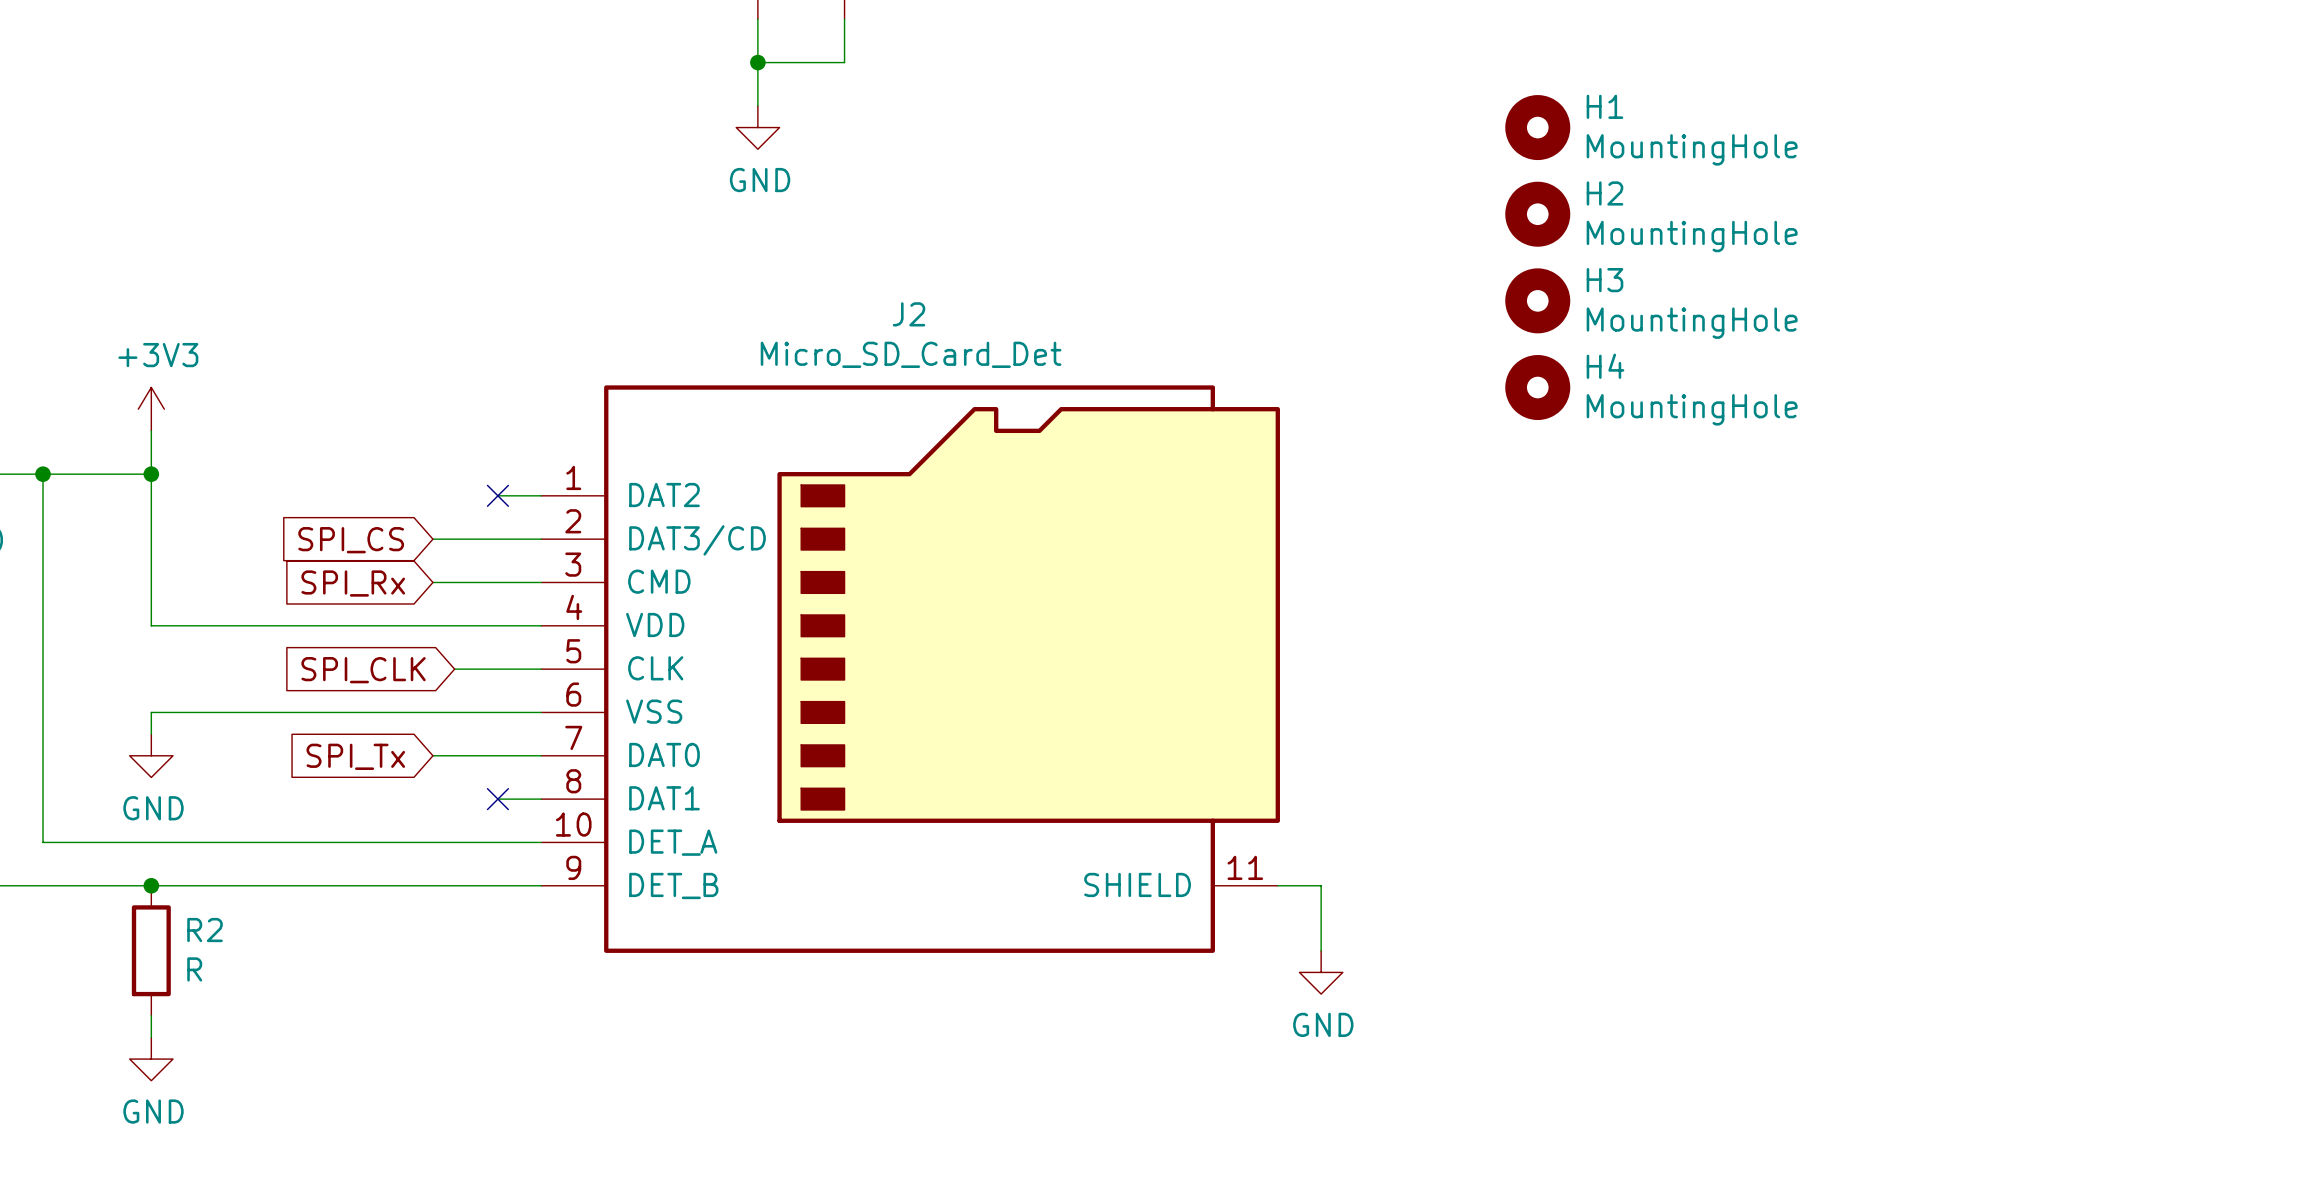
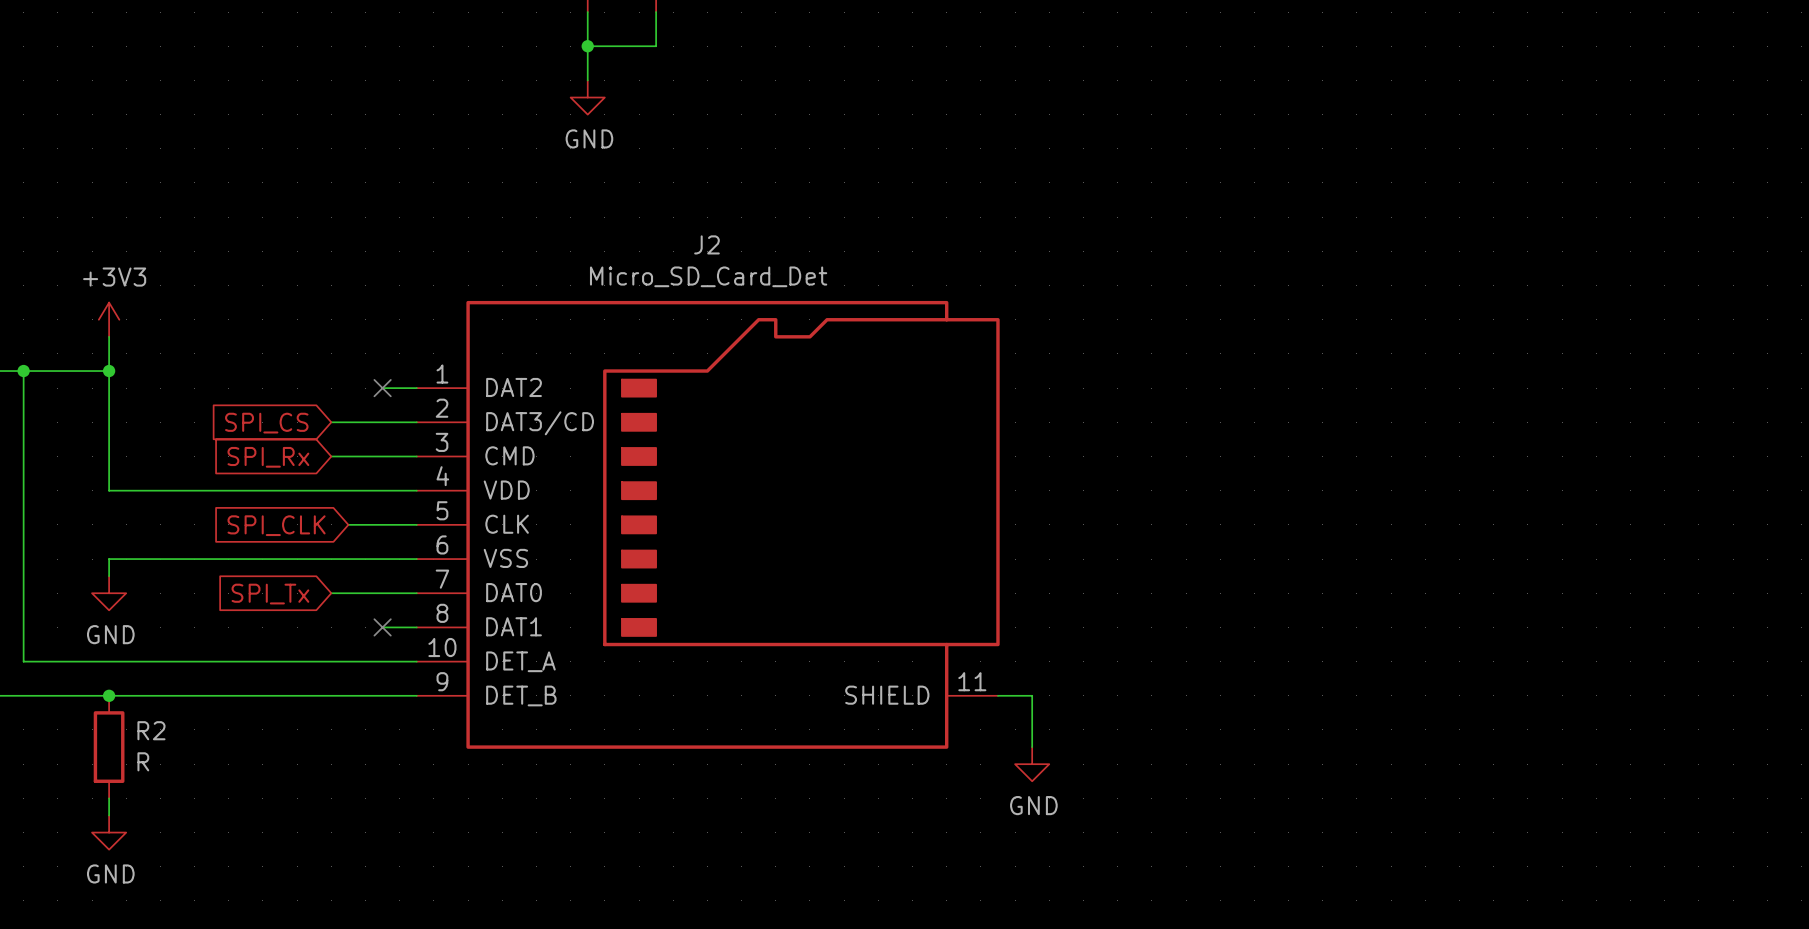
H1: MountingHole (1537, 127) -> none
H2: MountingHole (1537, 214) -> none
H3: MountingHole (1537, 300) -> none
H4: MountingHole (1537, 387) -> none

